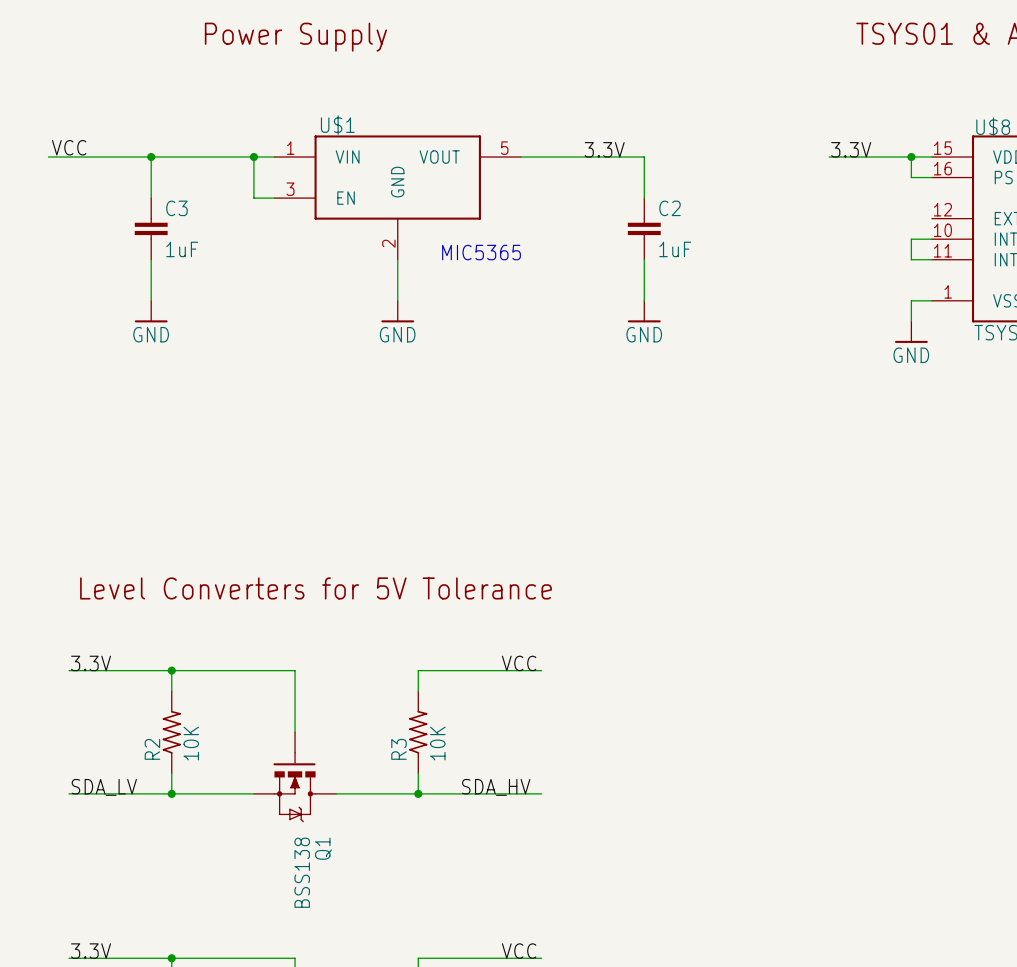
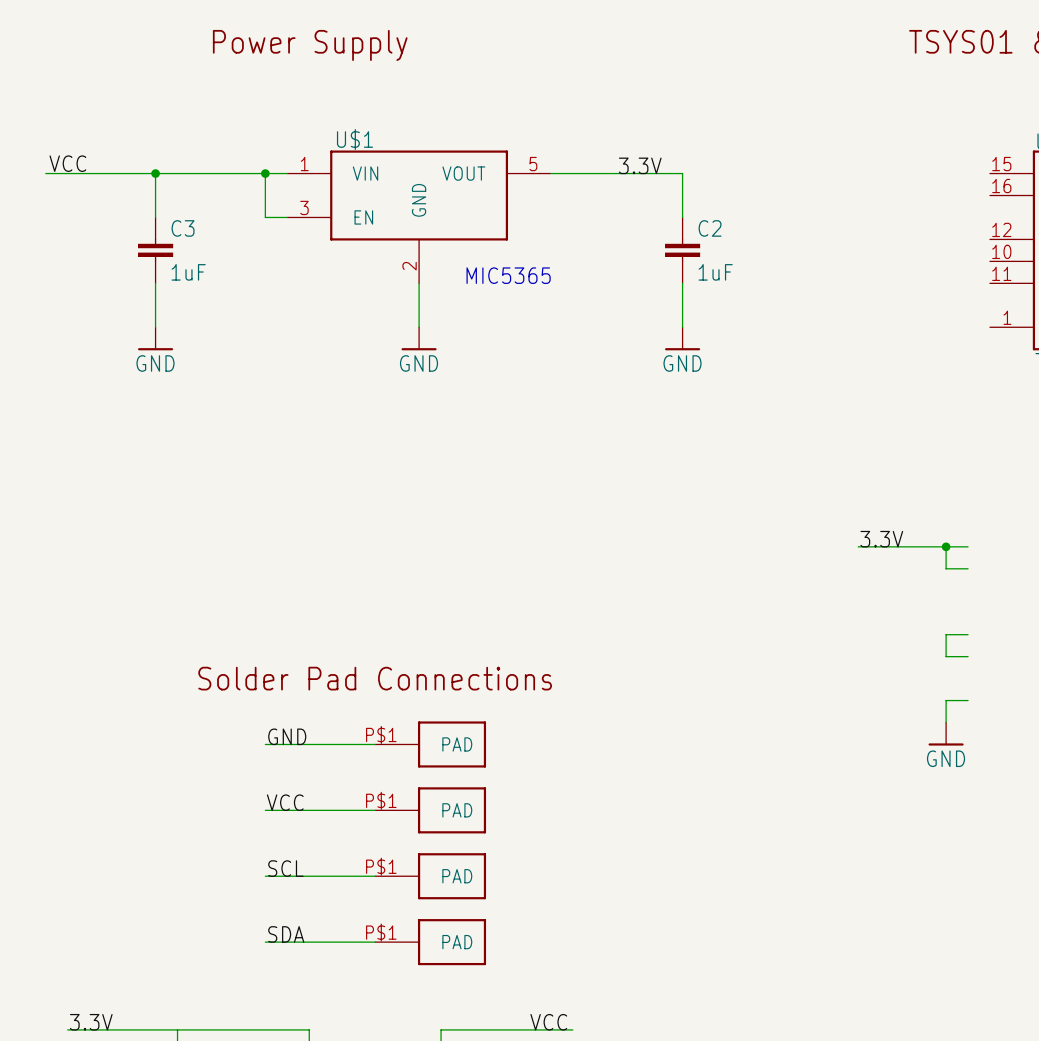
label: 3.3V (851, 149) -> none
wire: (829, 157) (931, 157) -> none
wire: (911, 157) (911, 177) (931, 177) -> none
junction: (911, 157) -> none
wire: (931, 239) (911, 239) (911, 259) (931, 259) -> none
wire: (931, 300) (911, 300) (911, 321) -> none
power symbol: GND (911, 332) -> none
label: none -> 3.3V (881, 539)
wire: none -> (858, 546) (968, 546)
wire: none -> (946, 546) (946, 568) (968, 568)
junction: none -> (946, 546)
text: Level Converters for 5V Tolerance (316, 588) -> none
wire: none -> (968, 634) (946, 634) (946, 656) (968, 656)
text: none -> Solder Pad Connections (375, 678)
wire: none -> (968, 700) (946, 700) (946, 722)
label: 3.3V (91, 663) -> none
label: VCC (519, 663) -> none
wire: (69, 670) (295, 670) (295, 732) -> none
wire: (171, 670) (171, 691) -> none
junction: (171, 670) -> none
wire: (541, 670) (418, 670) (418, 691) -> none
power symbol: none -> GND (946, 734)
label: none -> GND (287, 736)
wire: none -> (265, 744) (375, 744)
part: none -> (430, 744)
R2: 10K (171, 732) -> none
R3: 10K (418, 732) -> none
label: none -> VCC (285, 802)
wire: none -> (265, 810) (375, 810)
part: none -> (430, 810)
wire: (171, 773) (171, 793) -> none
wire: (418, 773) (418, 793) -> none
Q1: BSS138 (295, 777) -> none
label: SDA_LV (104, 787) -> none
label: SDA_HV (496, 787) -> none
wire: (69, 793) (253, 793) -> none
junction: (171, 793) -> none
wire: (336, 793) (541, 793) -> none
junction: (418, 793) -> none
label: none -> SCL (285, 868)
wire: none -> (265, 876) (375, 876)
part: none -> (430, 876)
label: none -> SDA (286, 934)
wire: none -> (265, 942) (375, 942)
part: none -> (430, 942)
junction: (171, 958) -> none

